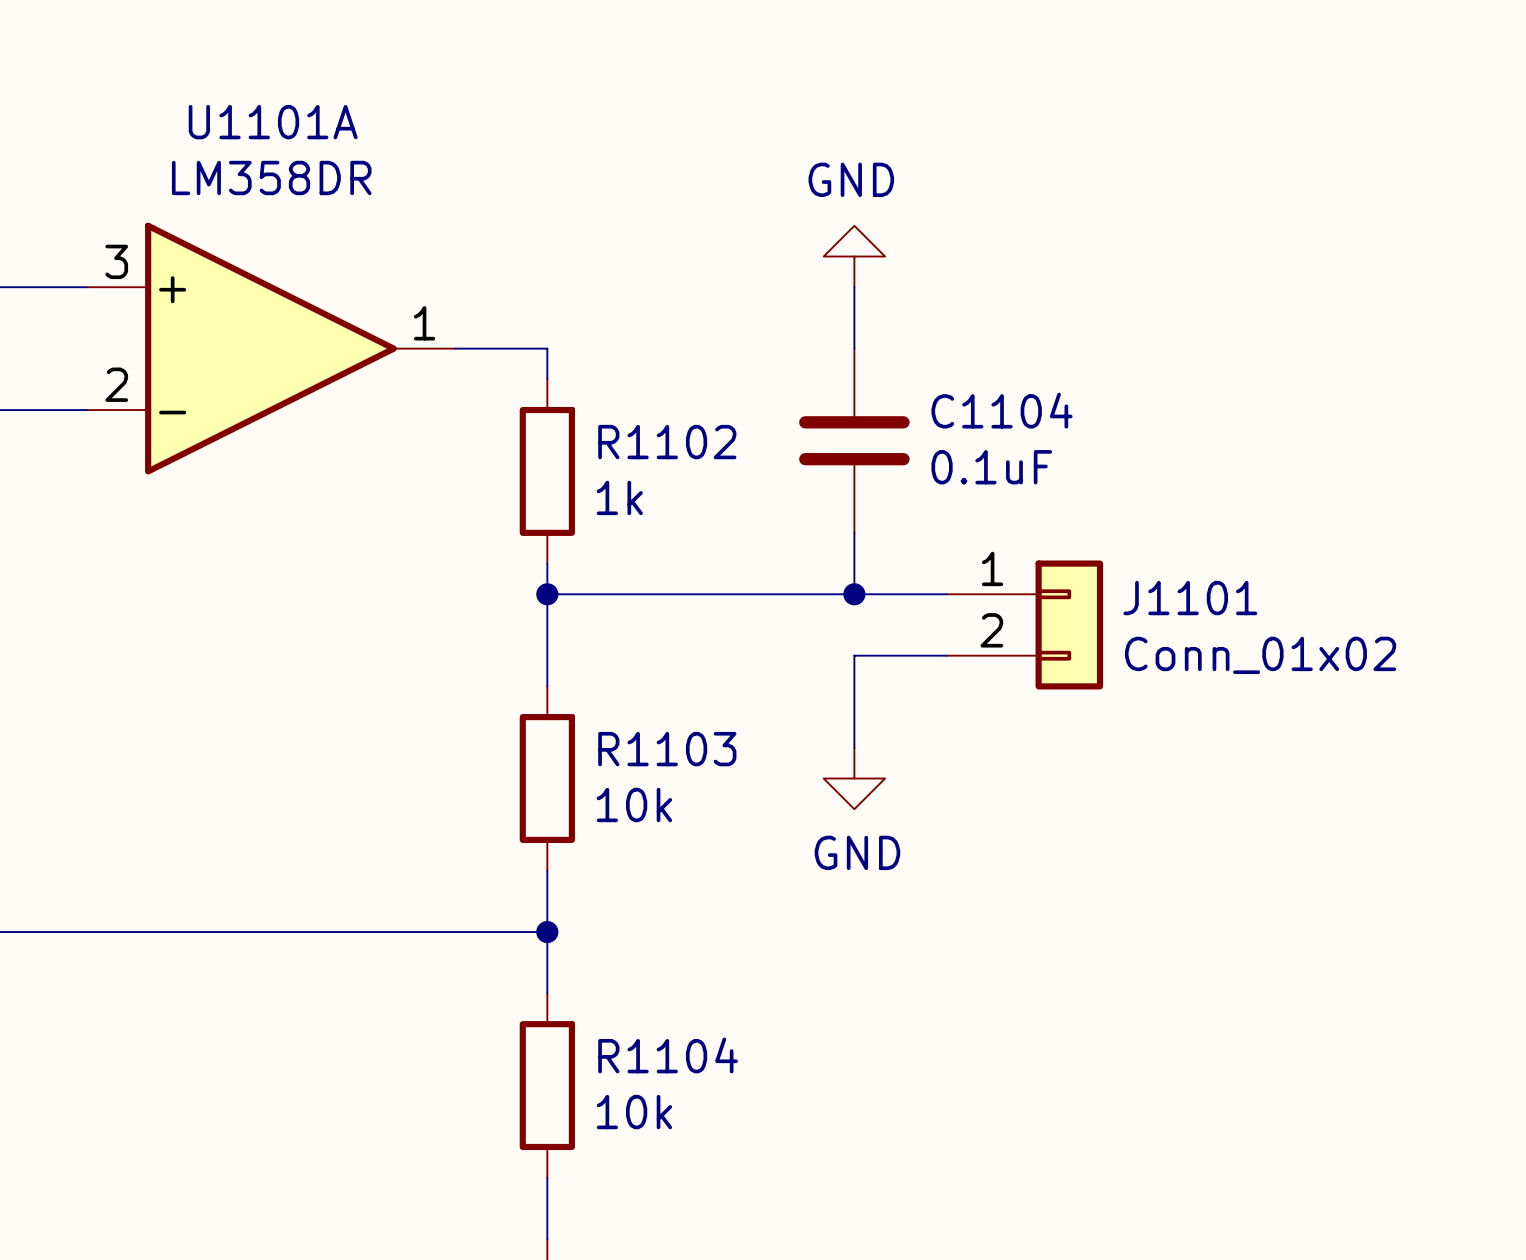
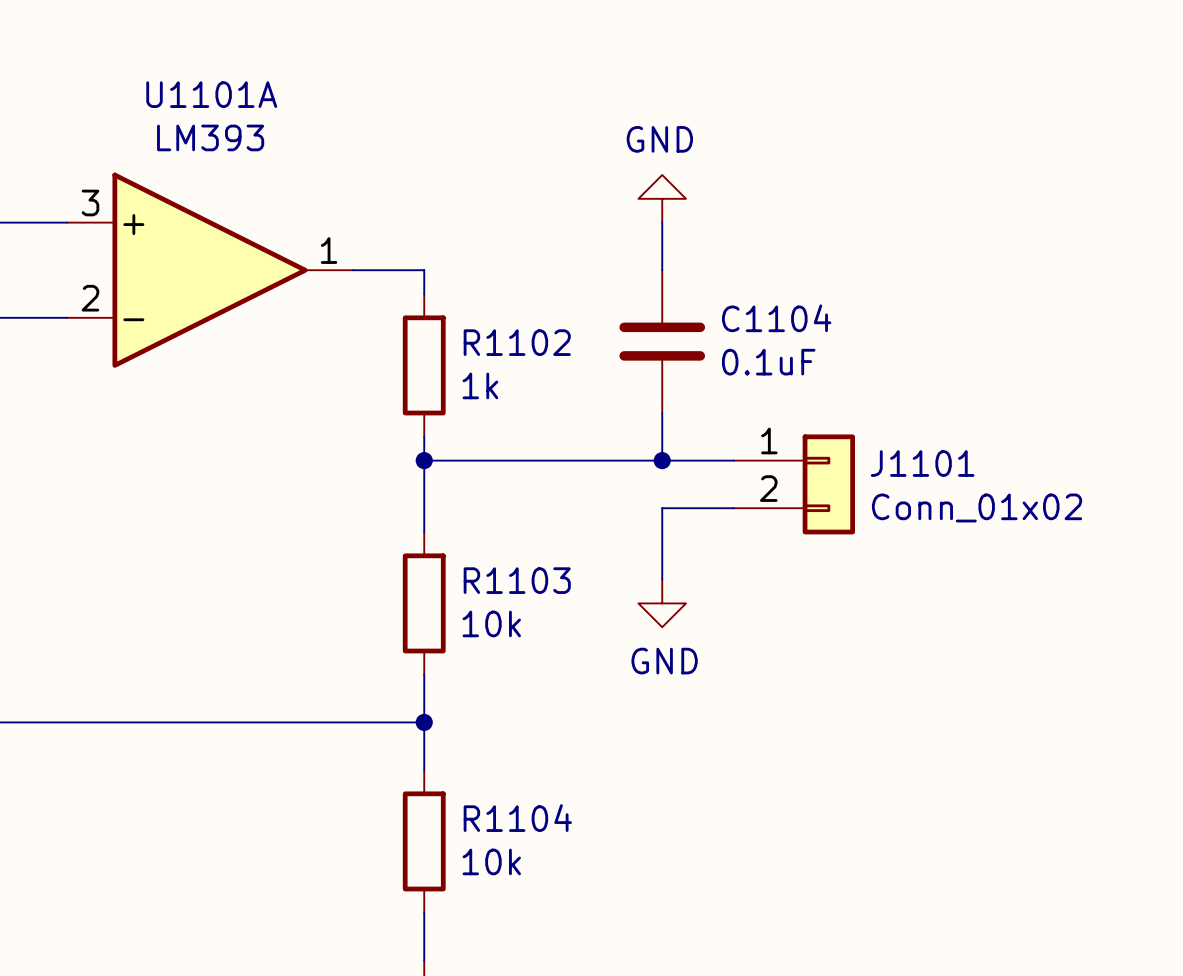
U1101A value: LM358DR (271, 177) -> LM393 (210, 137)

